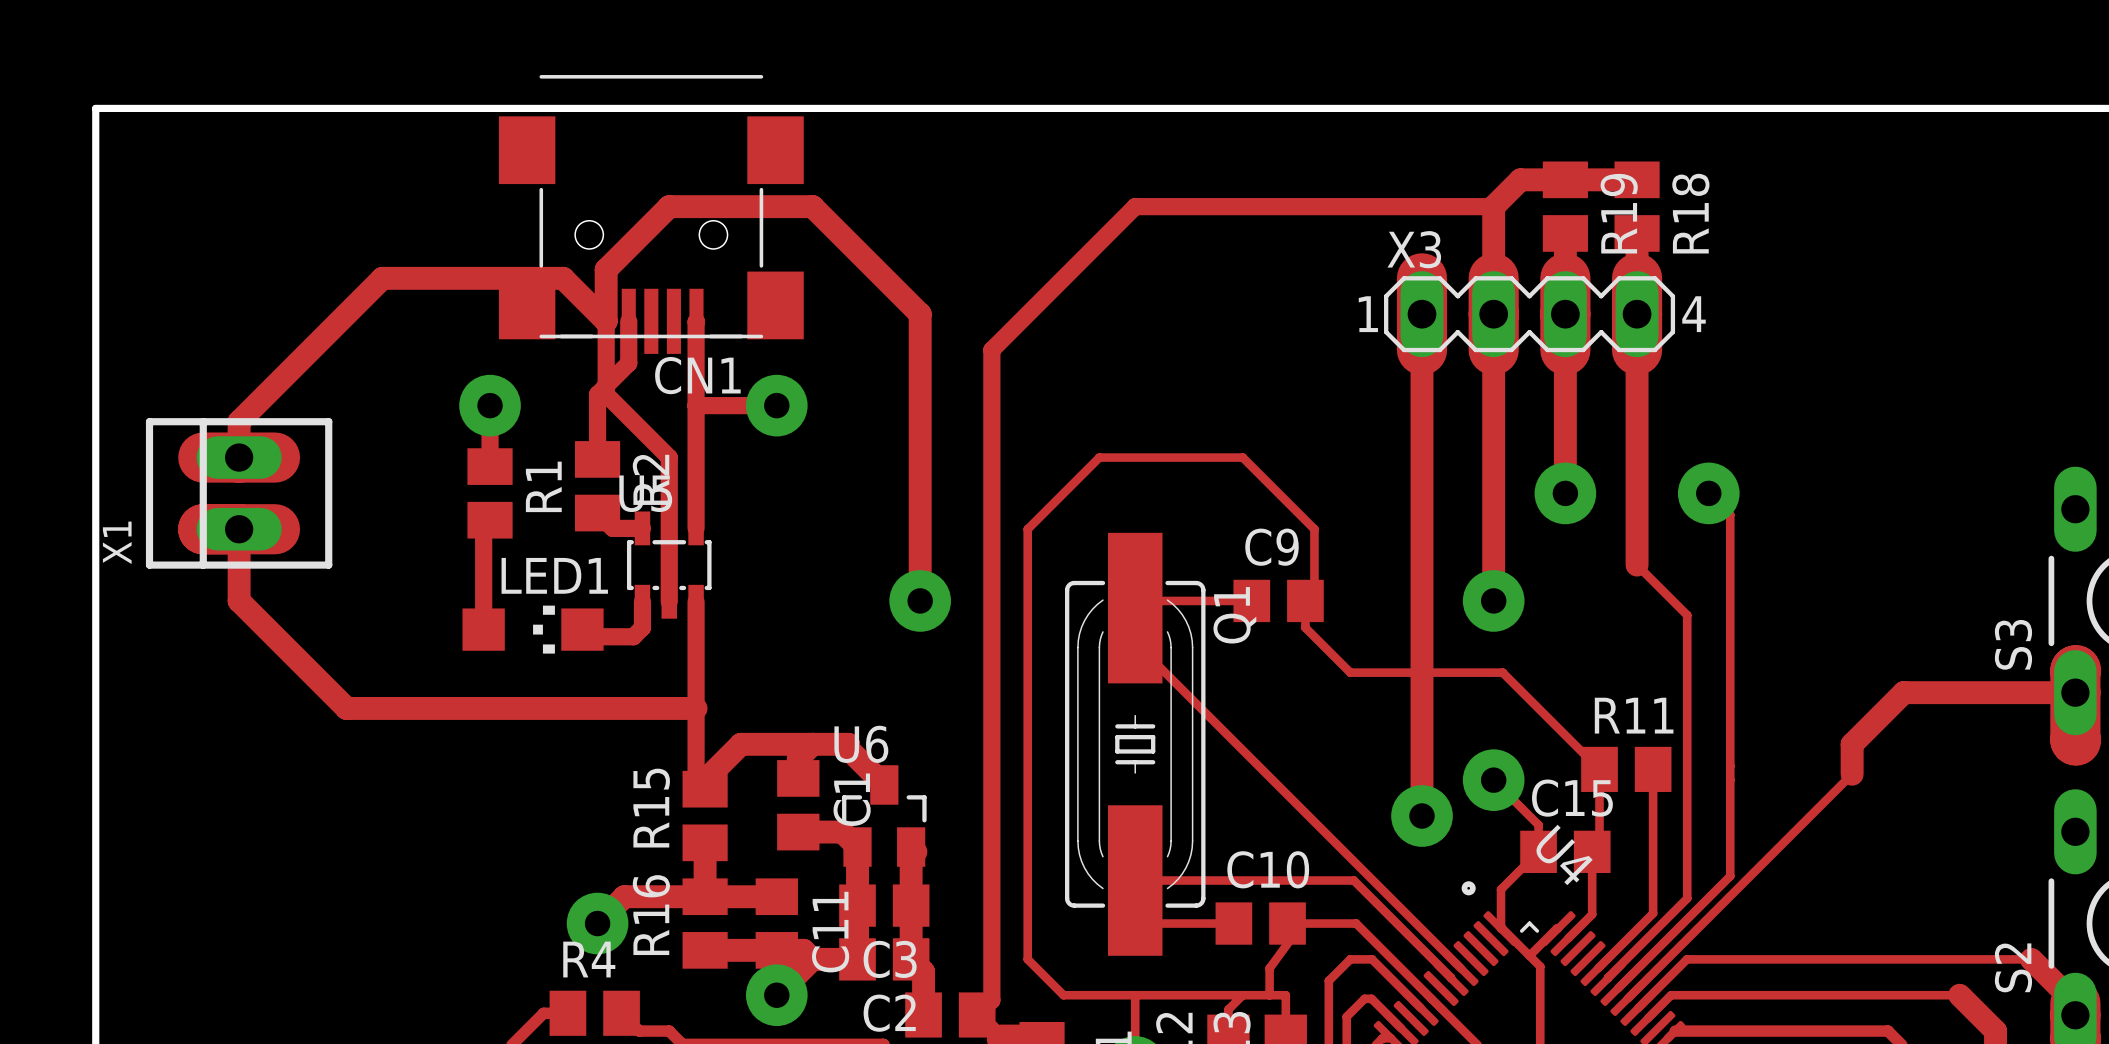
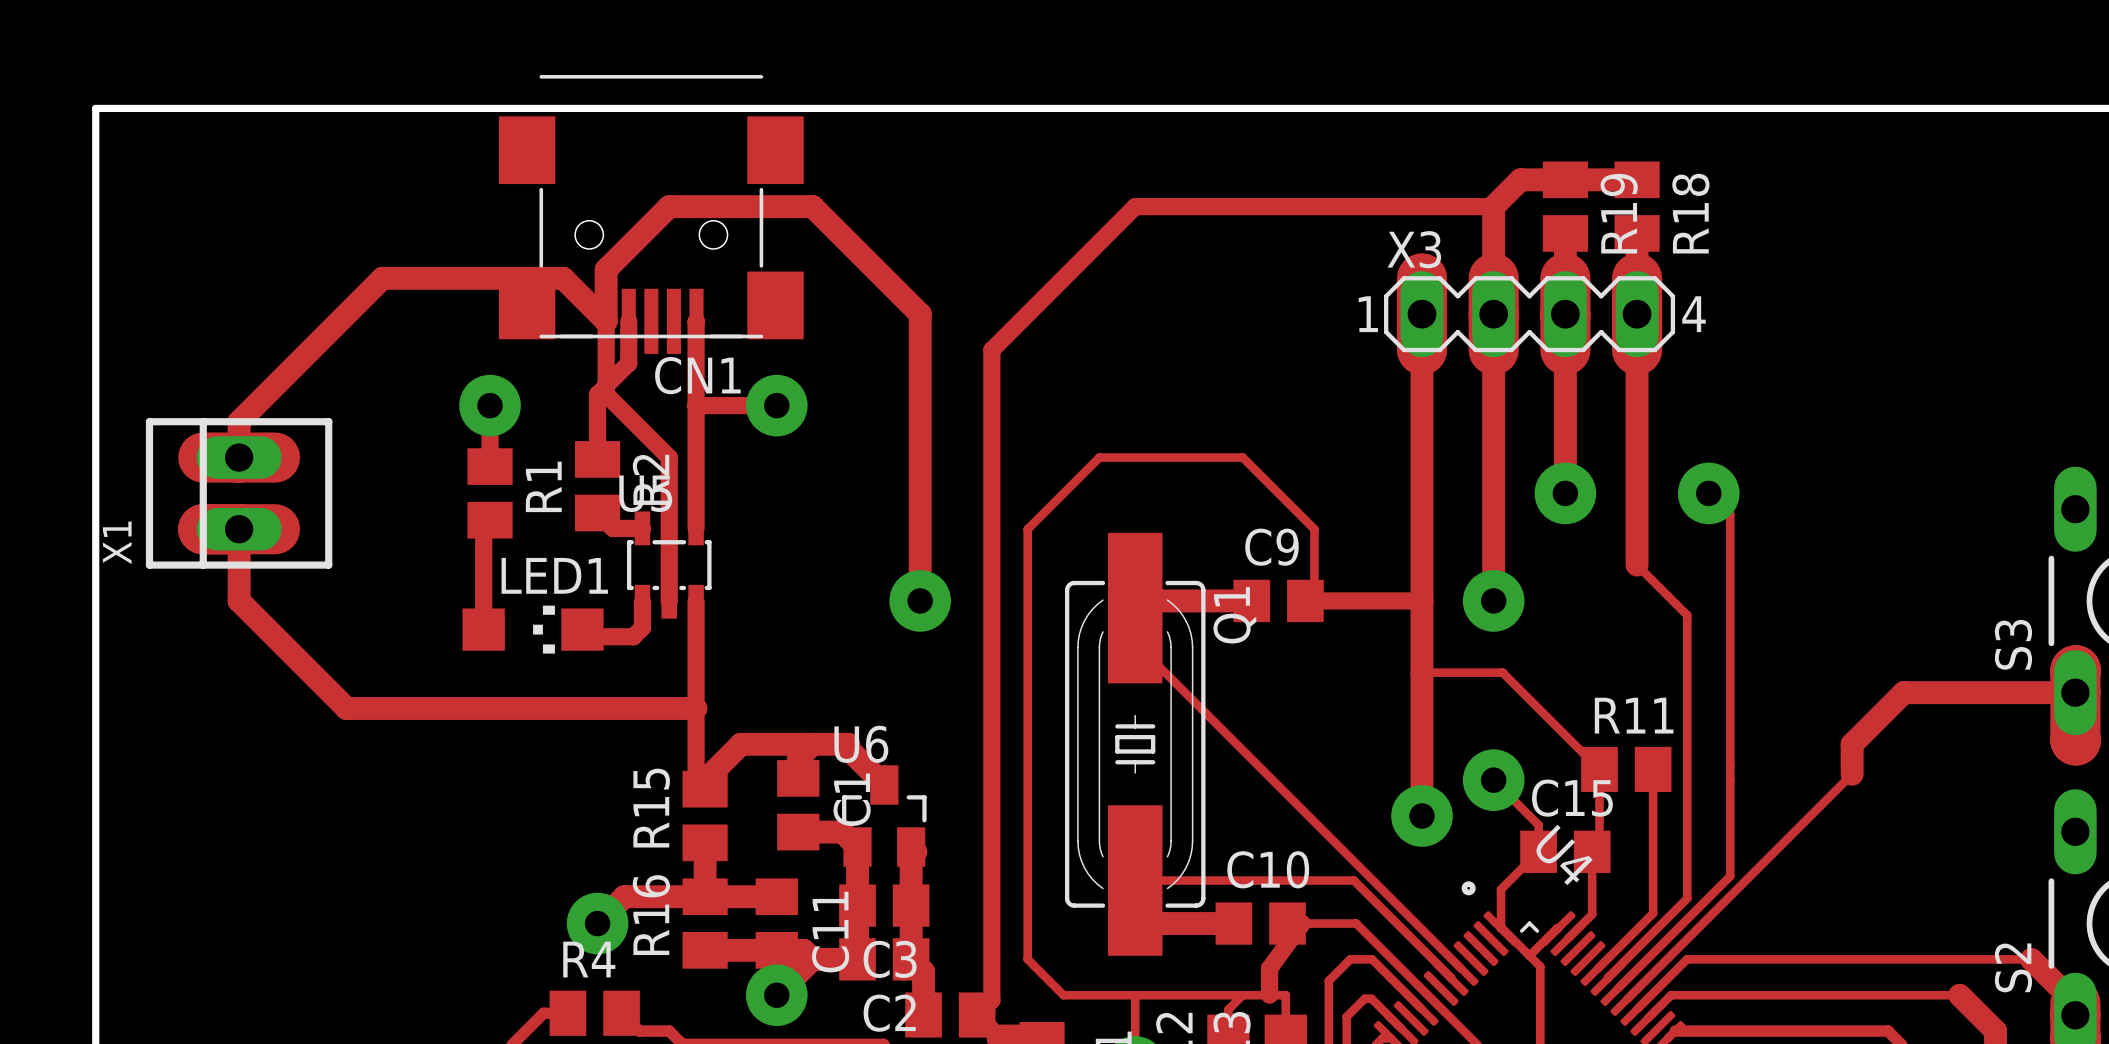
track width: thin (1142, 600) (1251, 600) -> thick (1142, 600) (1251, 600)
track: (1305, 600) (1305, 627) (1350, 672) (1422, 672) -> (1305, 600) (1422, 600)
track width: thin (1135, 923) (1233, 923) -> thick (1135, 923) (1233, 923)
track width: thin (1302, 923) (1269, 968) (1269, 995) -> thick (1302, 923) (1269, 968) (1269, 995)

